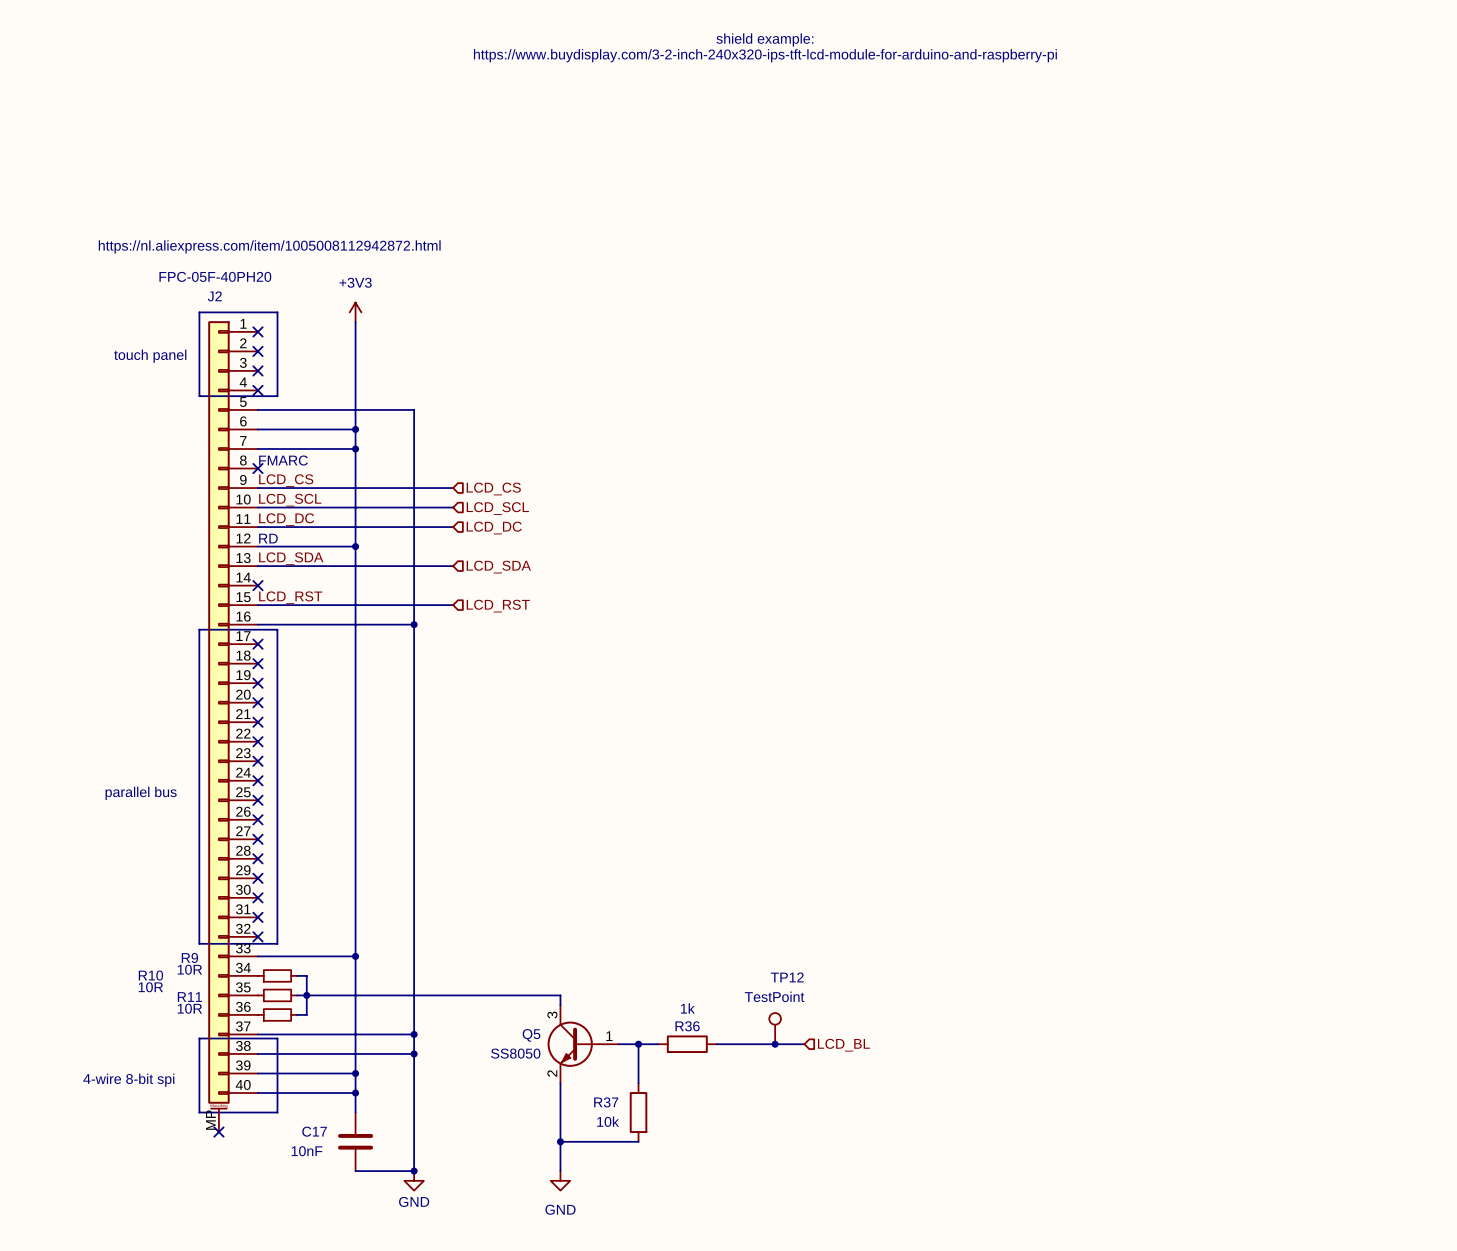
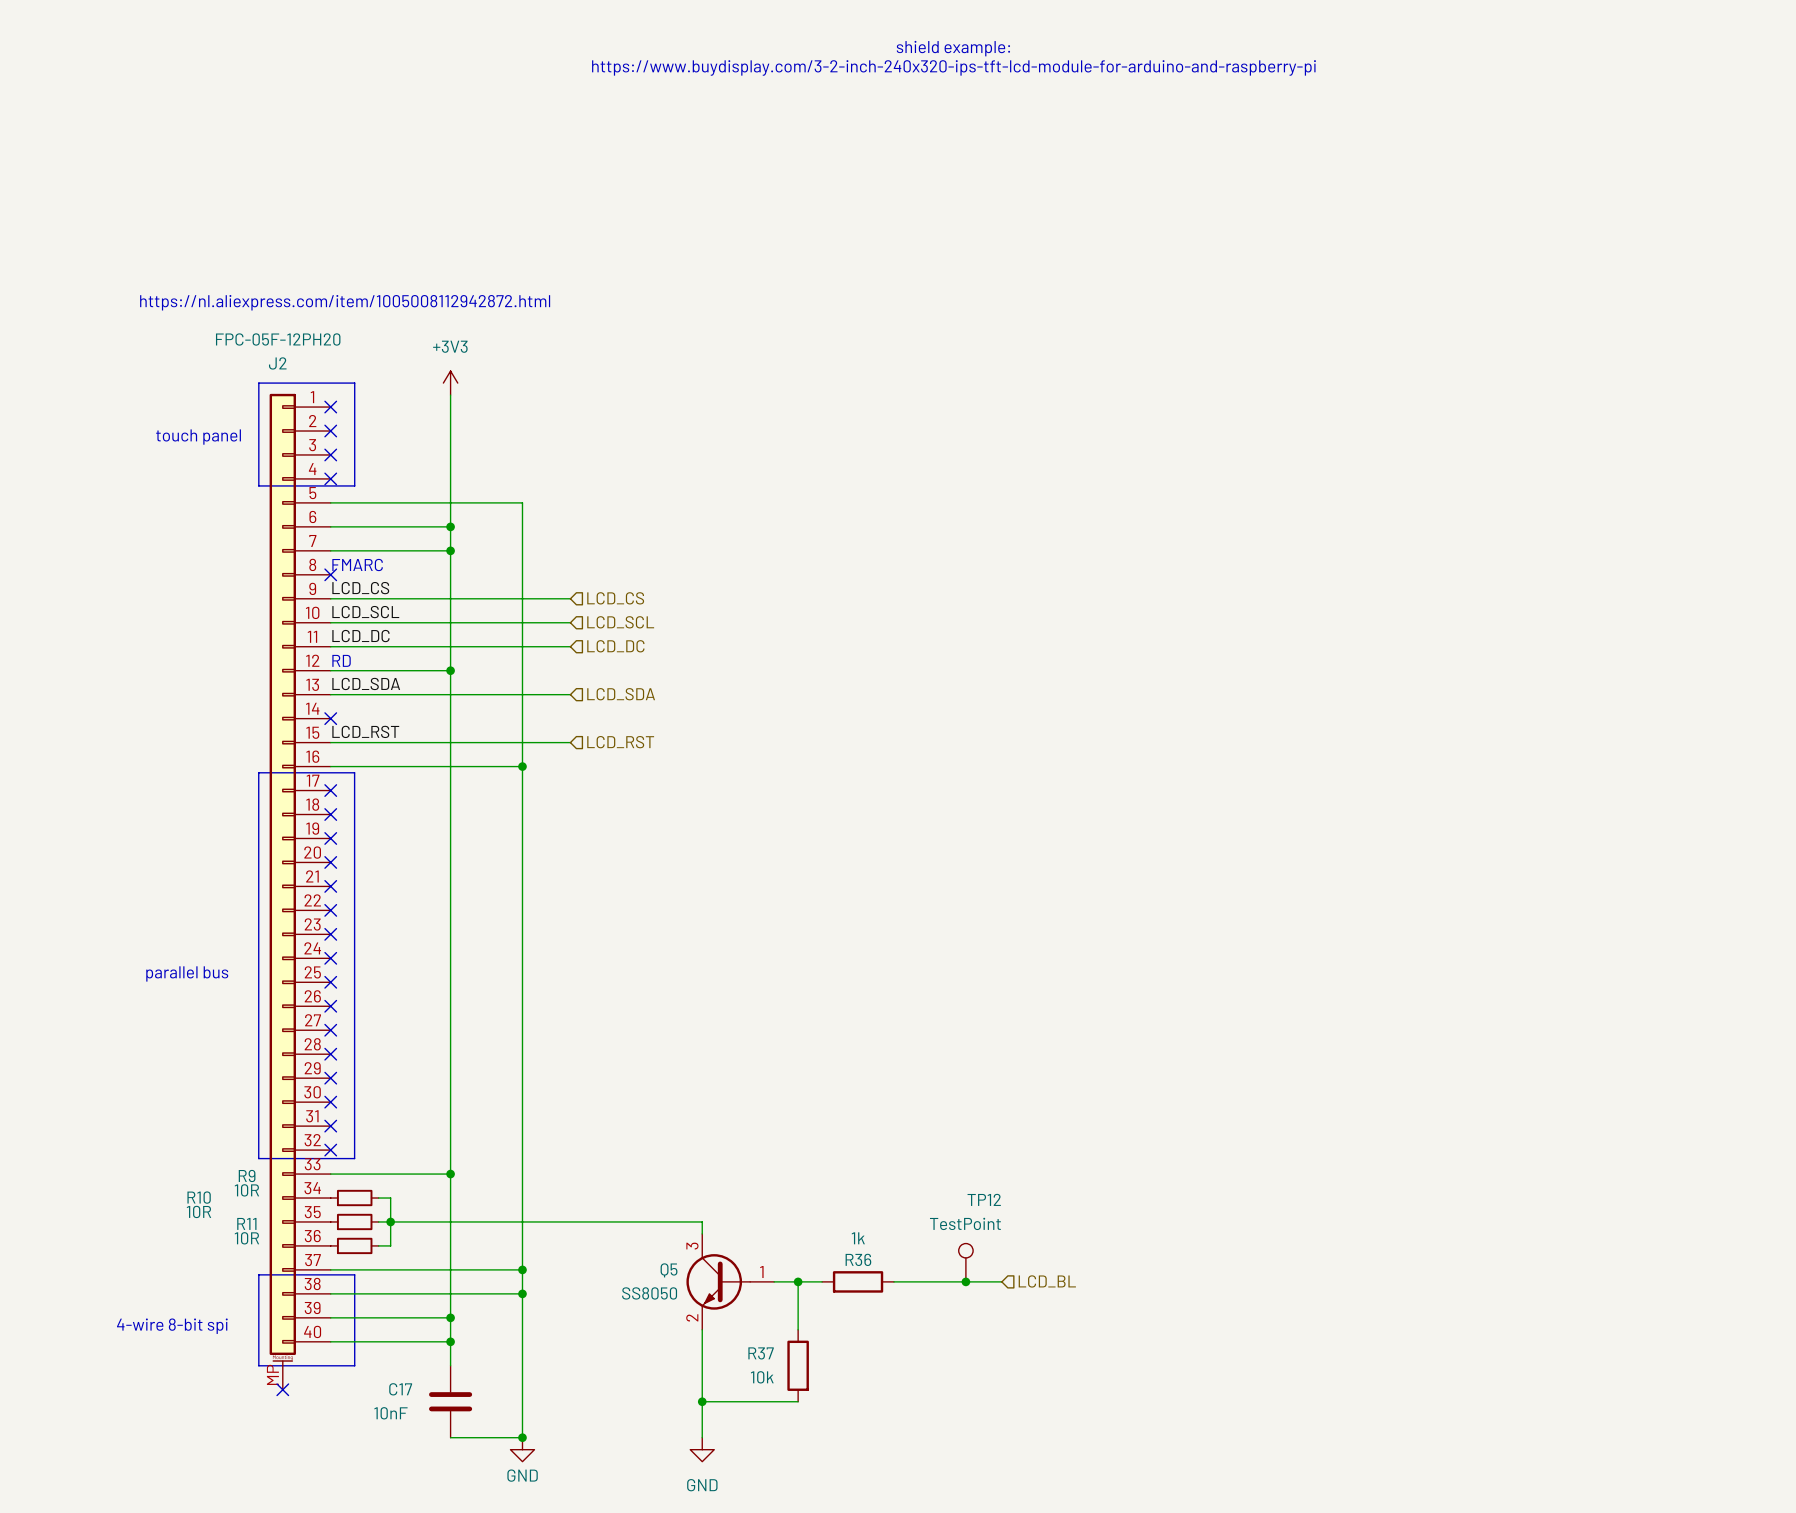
J2 value: FPC-05F-40PH20 (215, 276) -> FPC-05F-12PH20 (278, 339)

